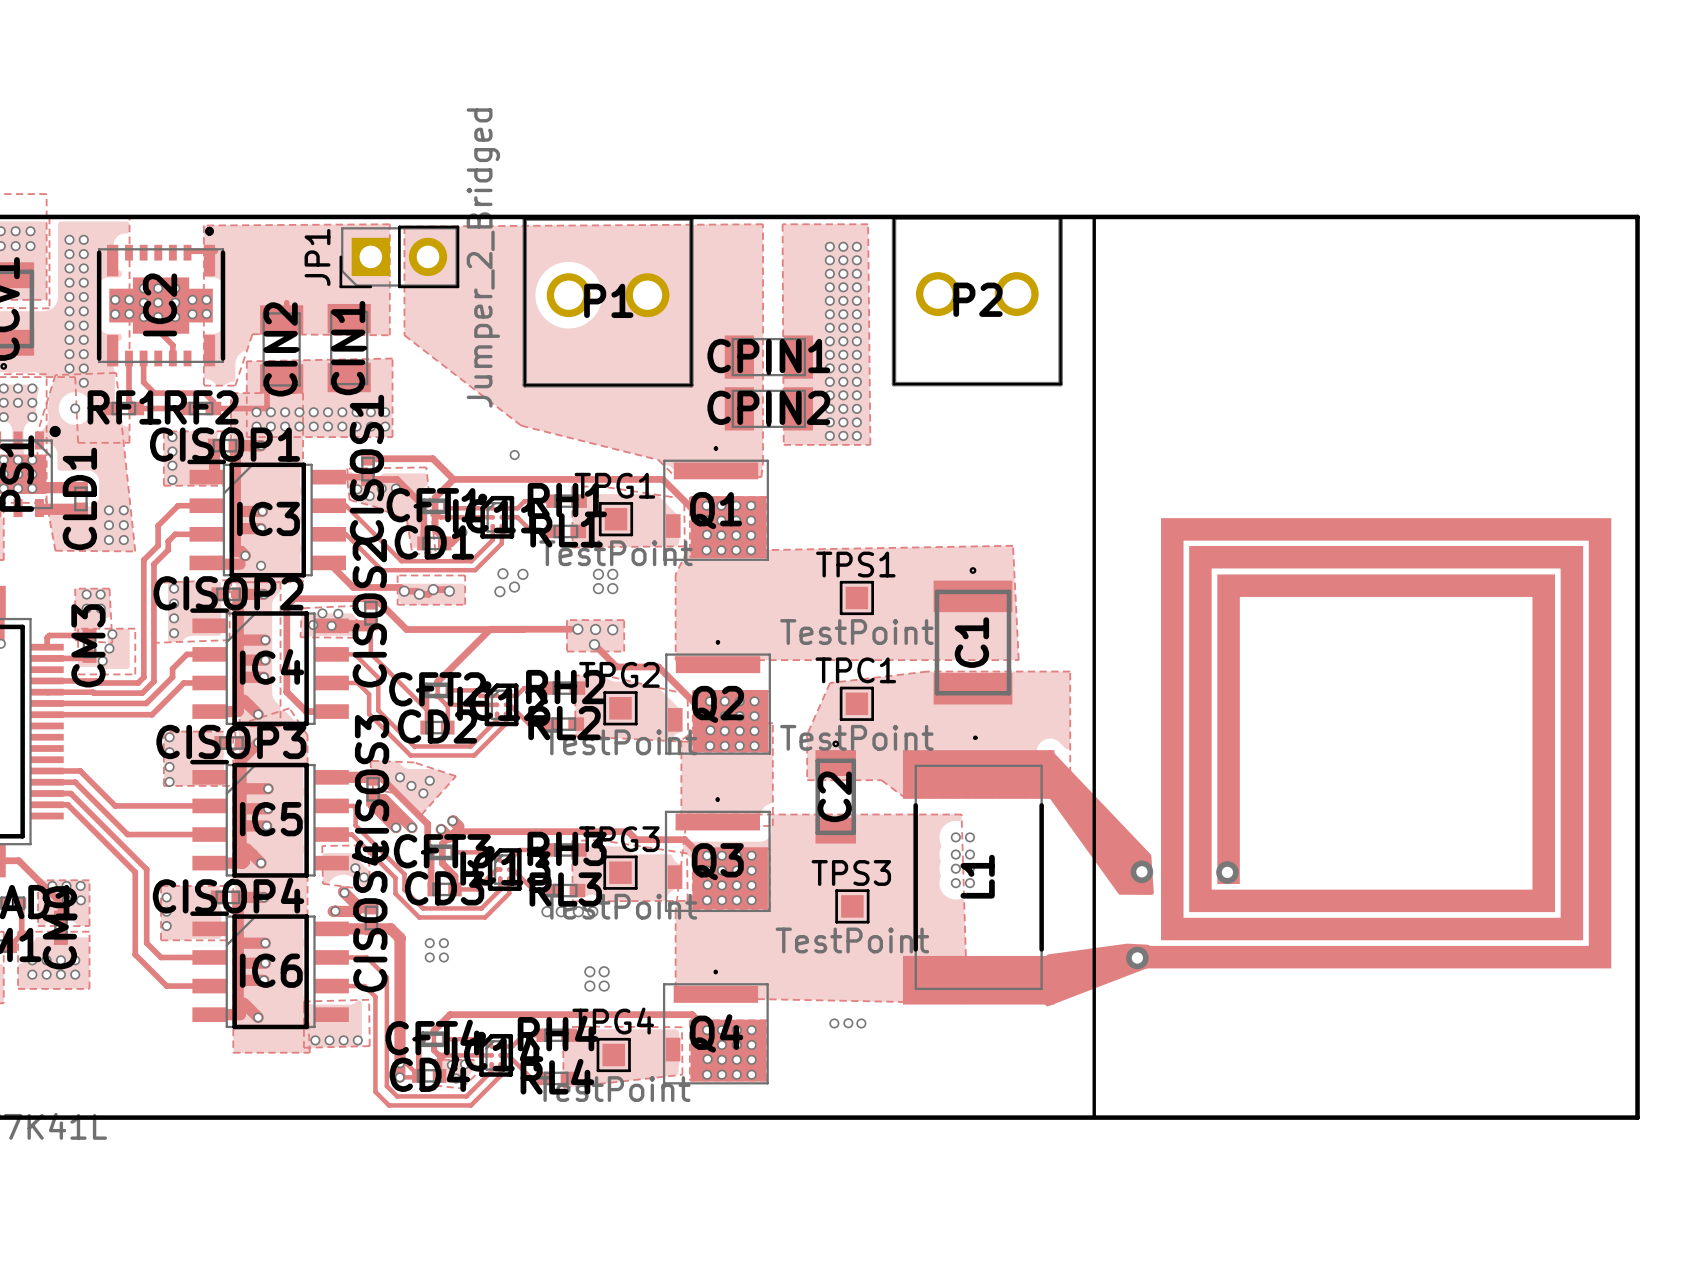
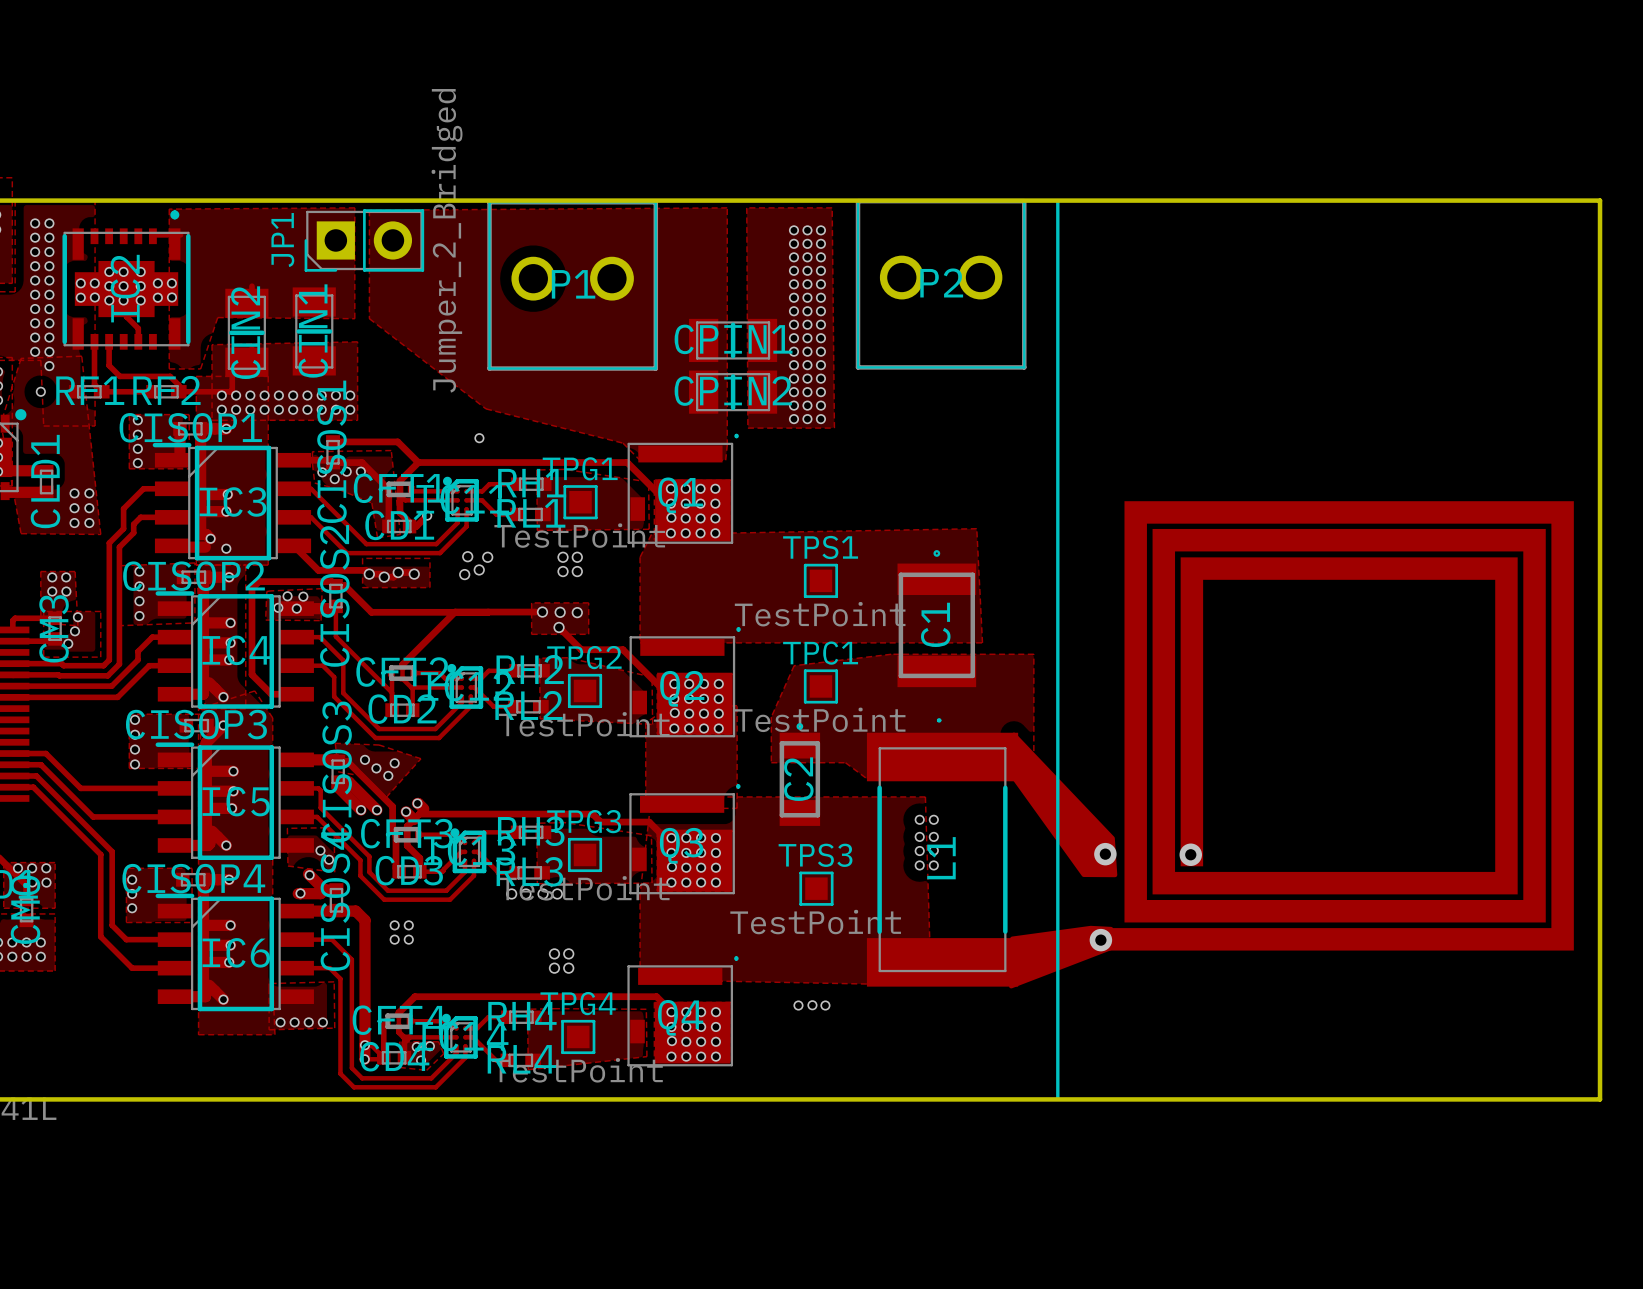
Q1 footprint: [663, 446, 769, 561] -> [627, 433, 739, 544]
Q2 footprint: [665, 640, 771, 755] -> [629, 627, 741, 738]
Q3 footprint: [664, 797, 771, 913] -> [629, 784, 741, 895]
Q4 footprint: [662, 969, 769, 1085] -> [627, 956, 739, 1067]

